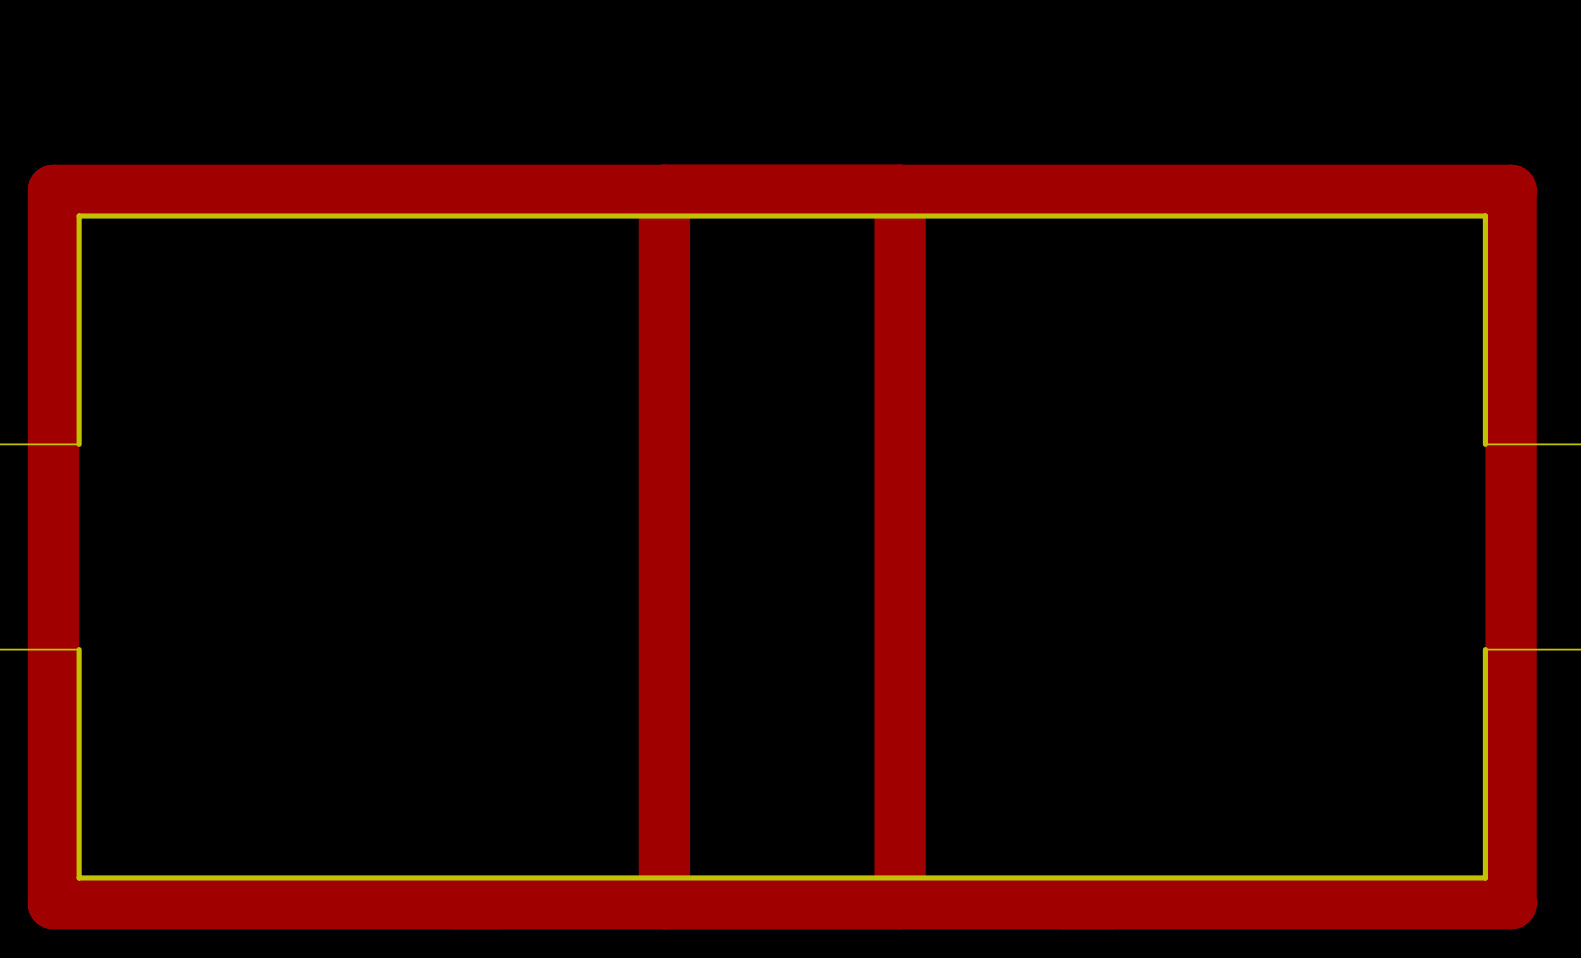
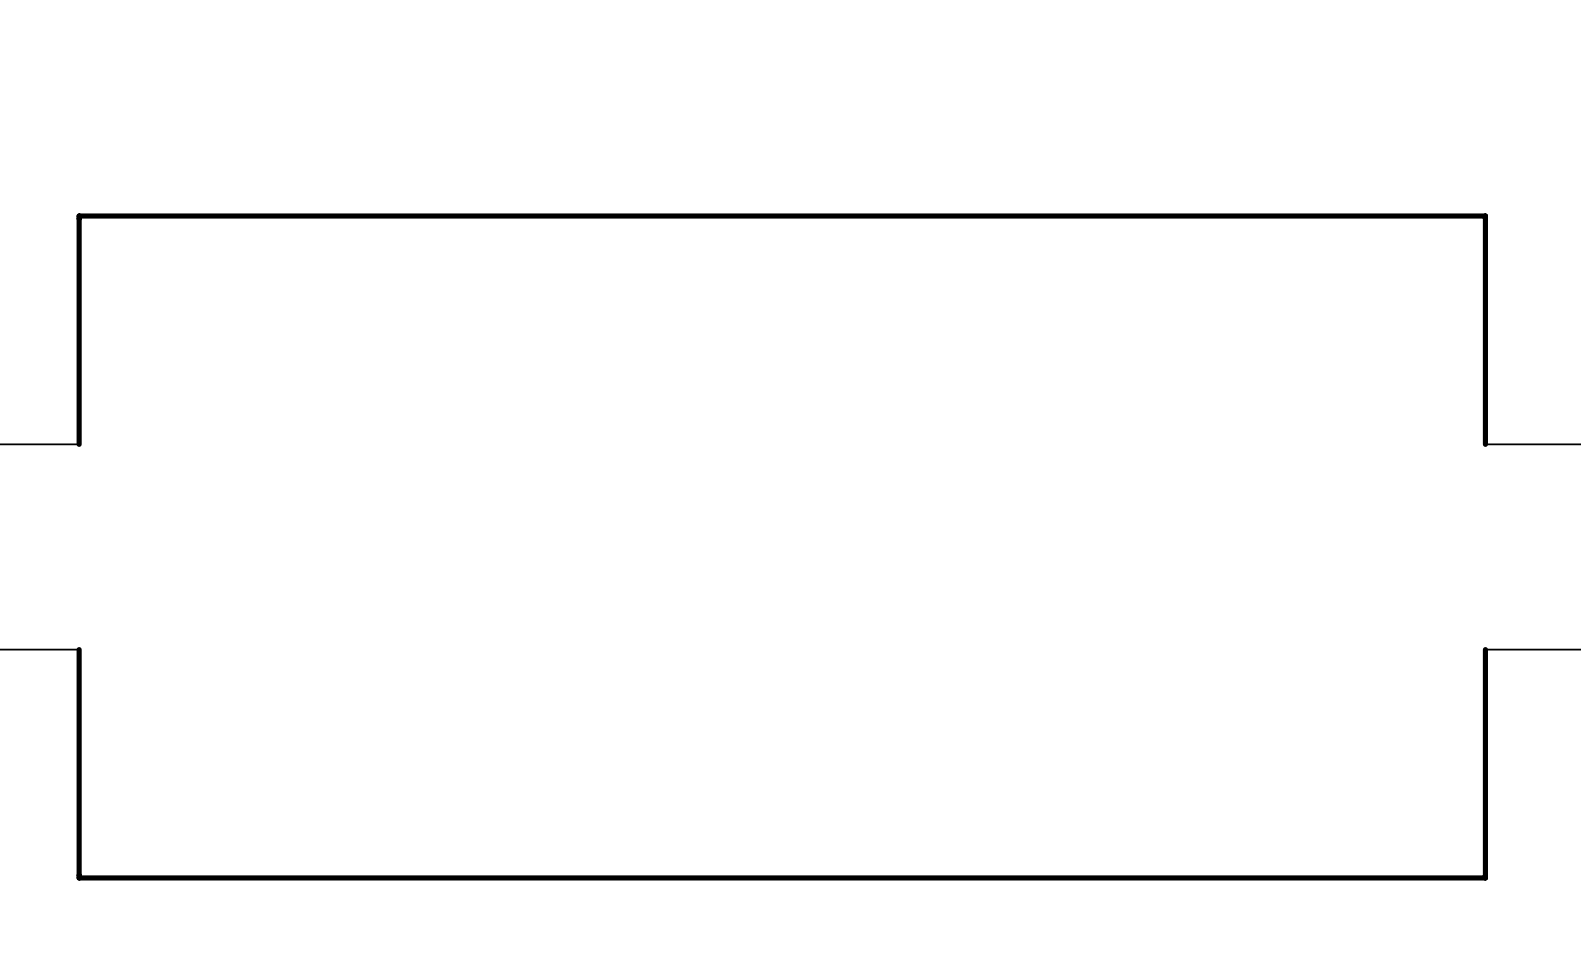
part: (476, 546) -> none
part: (1087, 546) -> none

